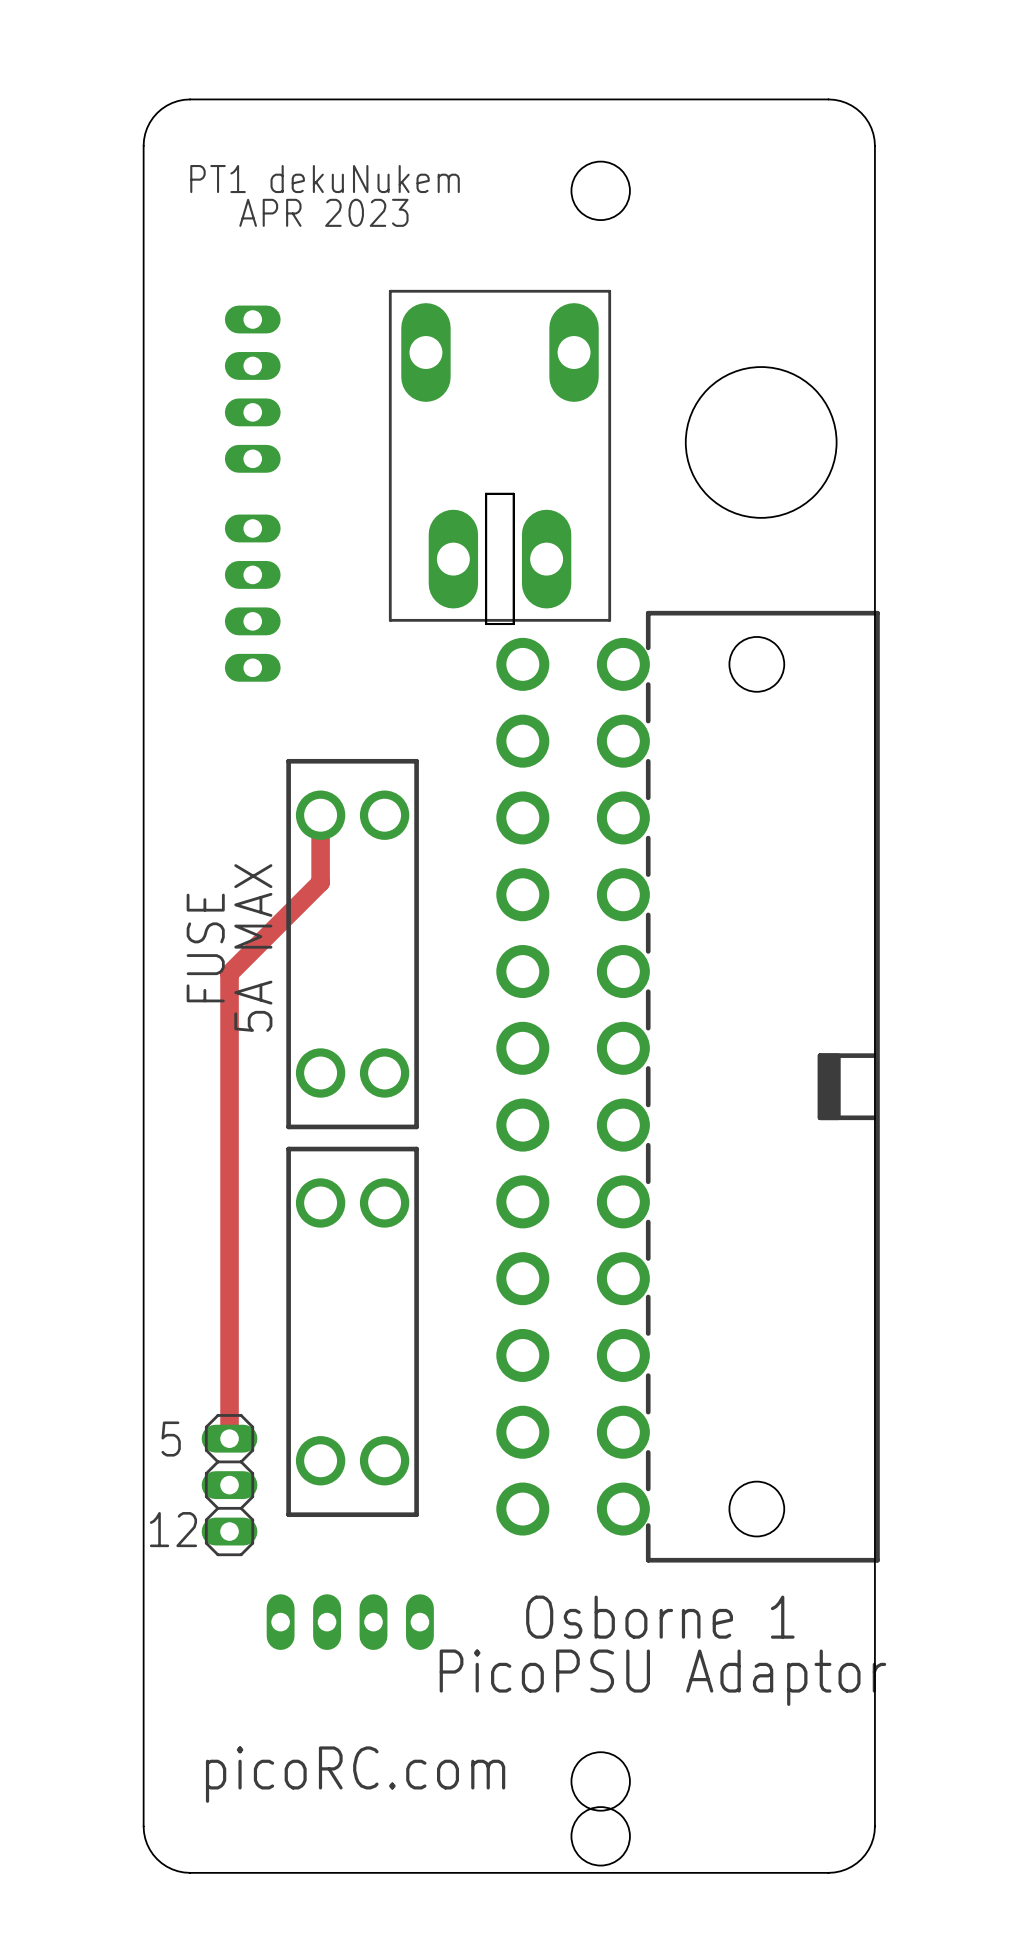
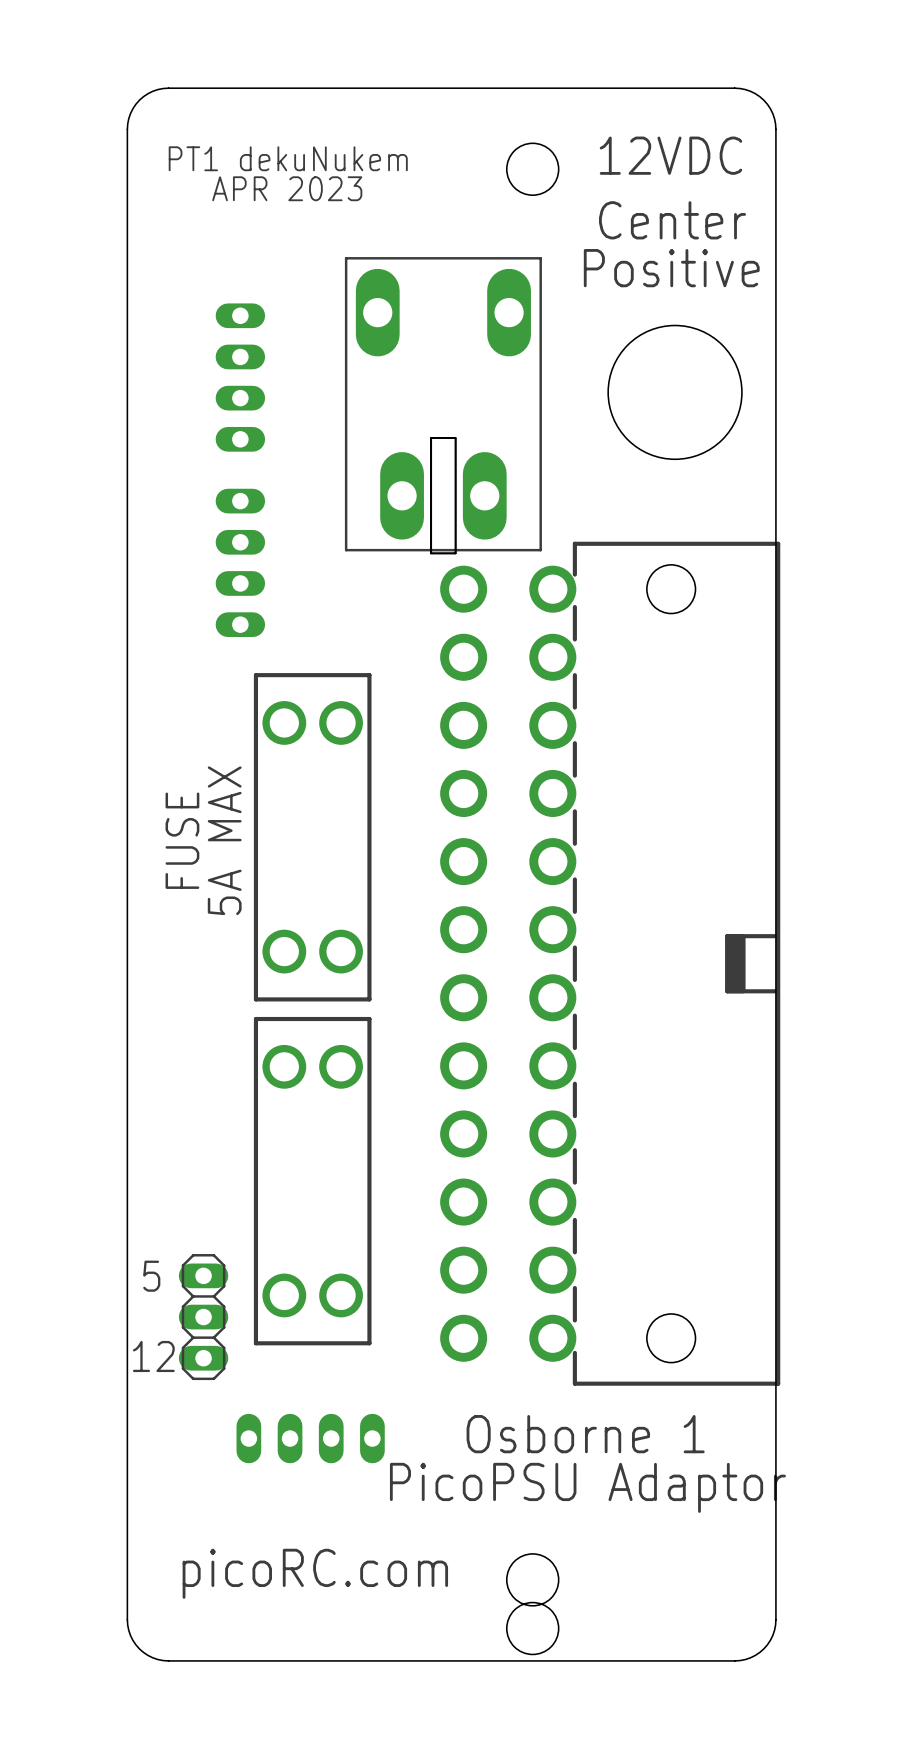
text: none -> 12VDC (670, 155)
text: none -> Center (672, 220)
text: none -> Positive (671, 268)
part position: (252, 389) -> (240, 377)
part position: (252, 598) -> (240, 562)
track: (320, 815) (320, 882) (229, 973) (229, 1438) -> none

